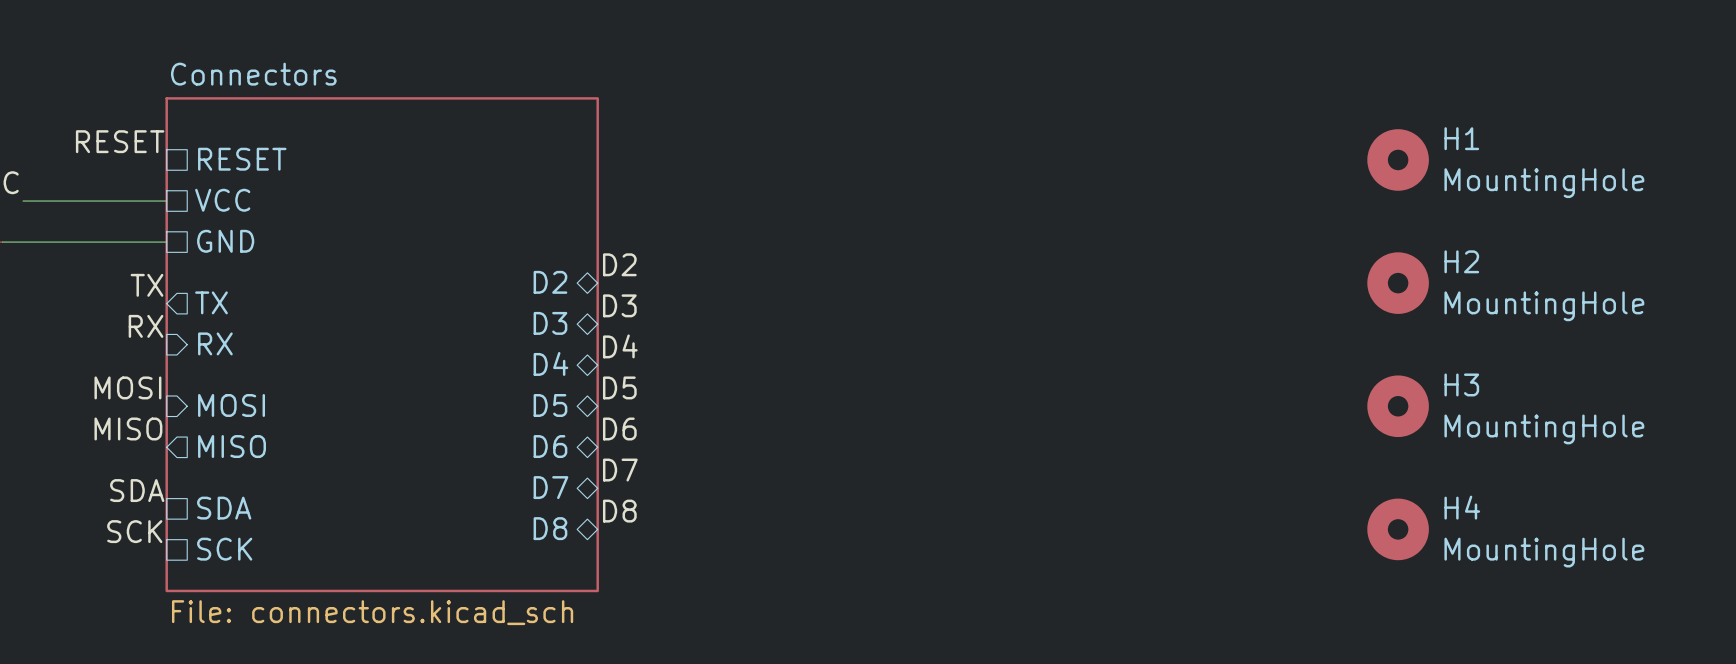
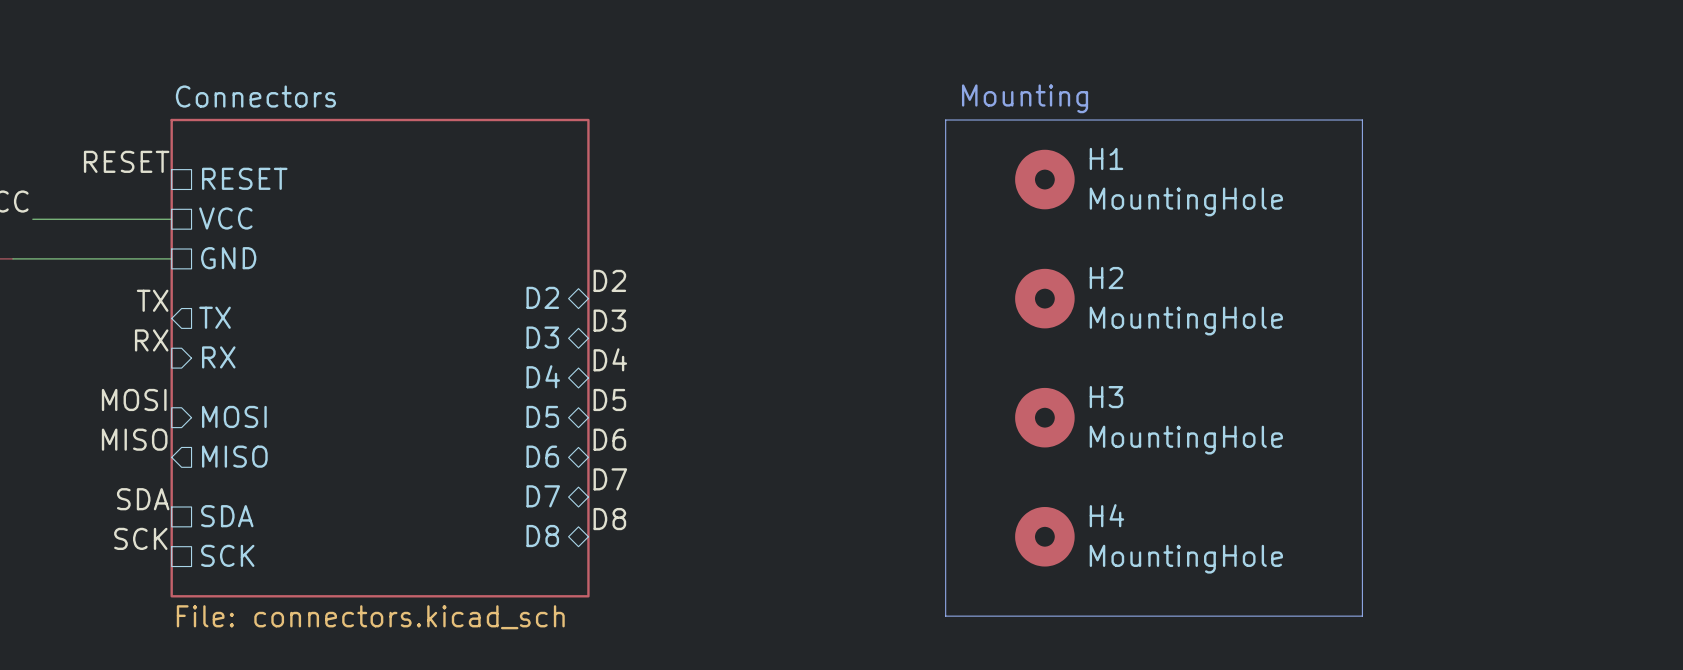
text: none -> Mounting (1025, 98)
line: none -> (945, 120) (1362, 120) (1362, 616) (945, 616) (945, 120)
H1 position: (1398, 159) -> (1044, 179)
H2 position: (1398, 283) -> (1044, 298)
H3 position: (1398, 406) -> (1044, 417)
H4 position: (1398, 529) -> (1044, 536)

